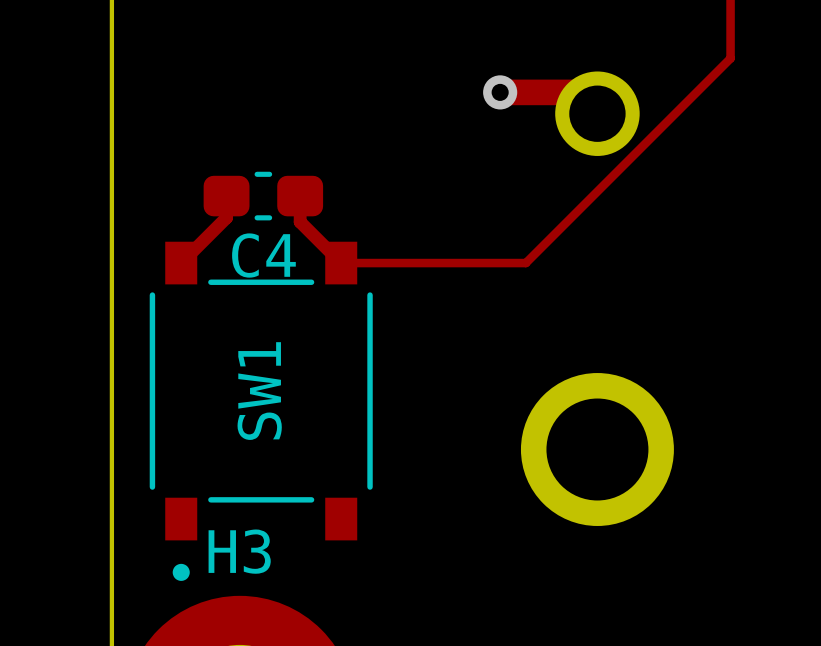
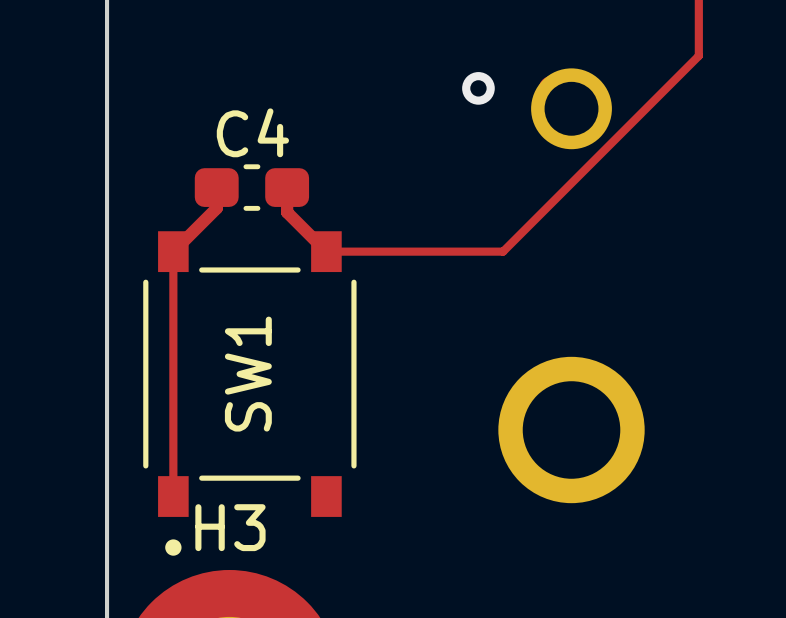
track: (500, 92) (576, 92) -> none
C4 name position: C4 (263, 255) -> C4 (252, 132)
track: none -> (173, 251) (173, 496)

